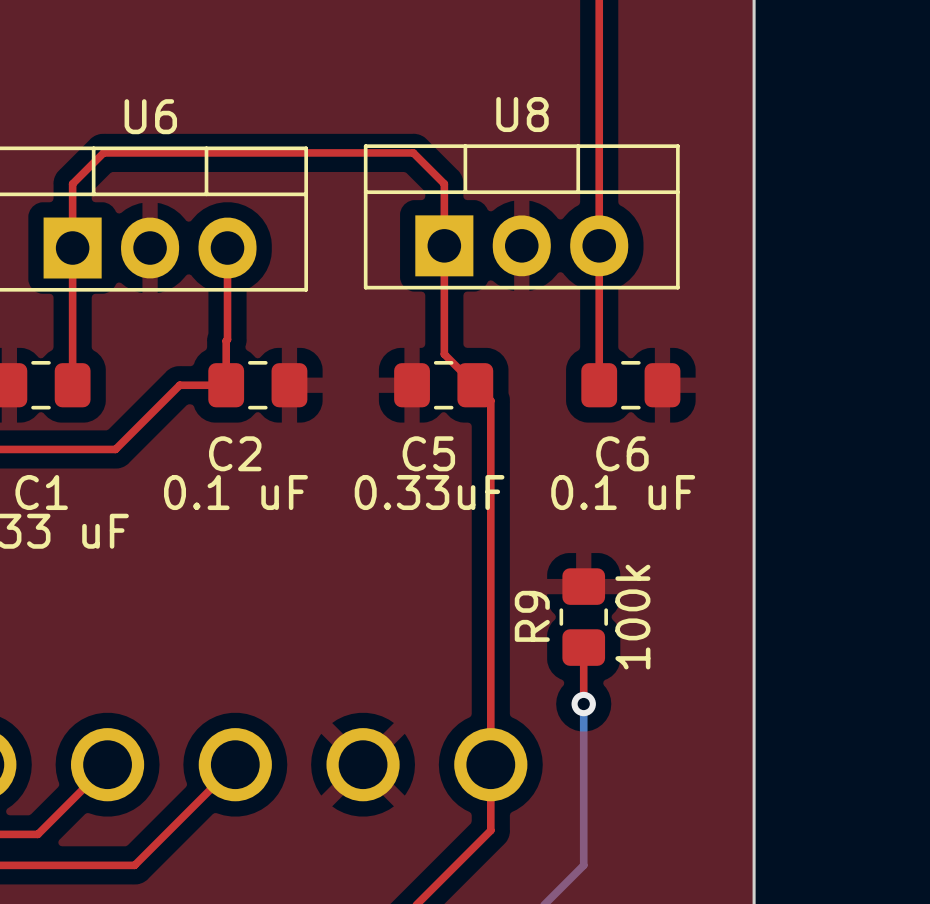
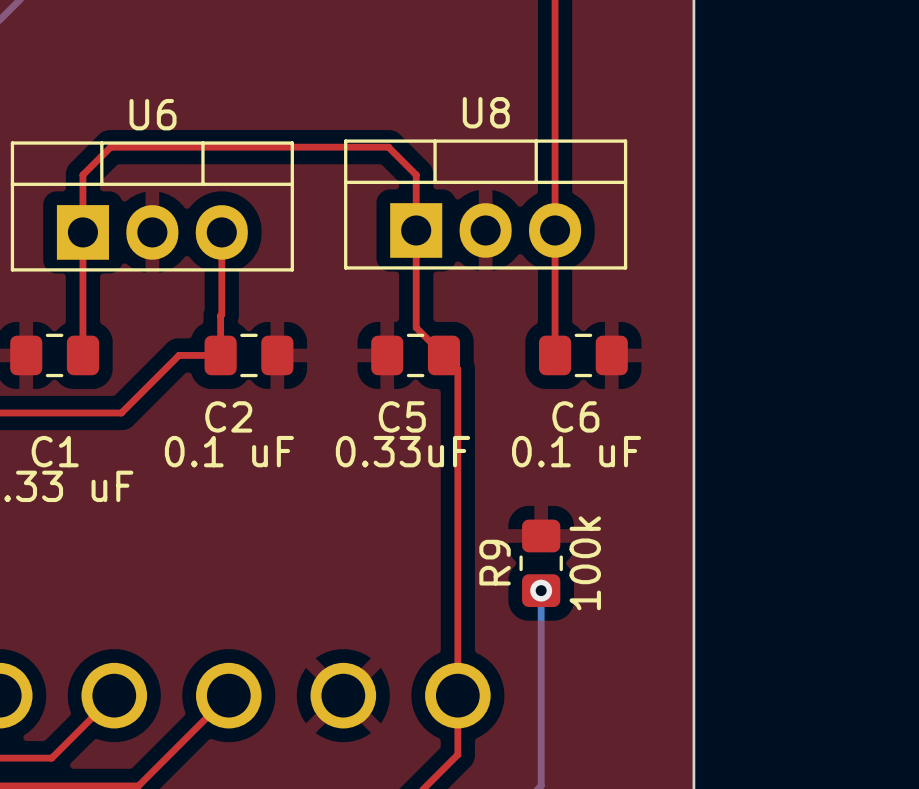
top track: (583, 647) (583, 704) -> none
bottom track: none -> (541, 590) (541, 641)
via position: (583, 704) -> (541, 590)

